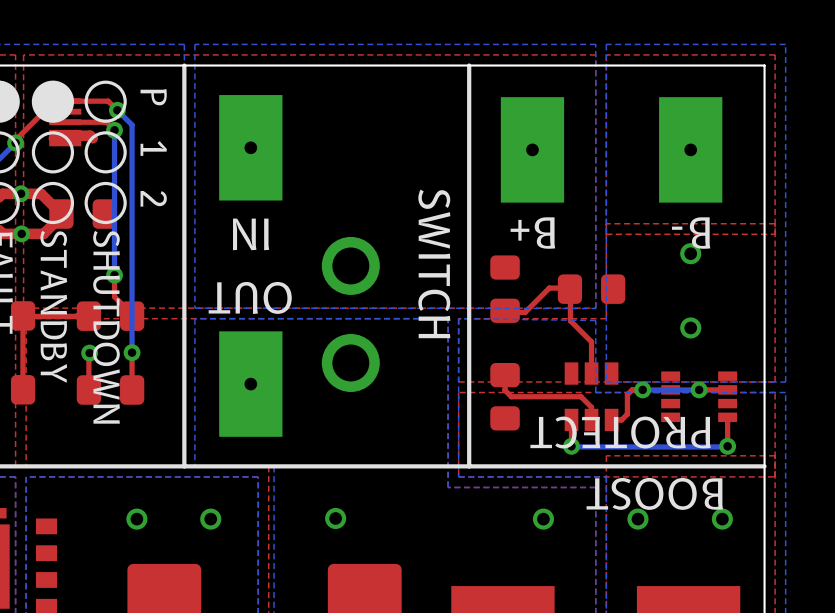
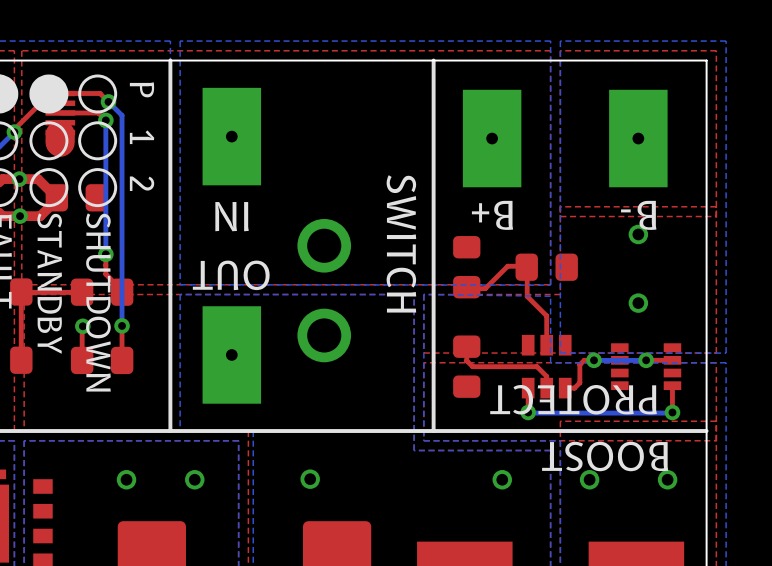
top track: (92, 138) (90, 135) (56, 135) (53, 138) -> none
top track: none -> (60, 134) (60, 142)

